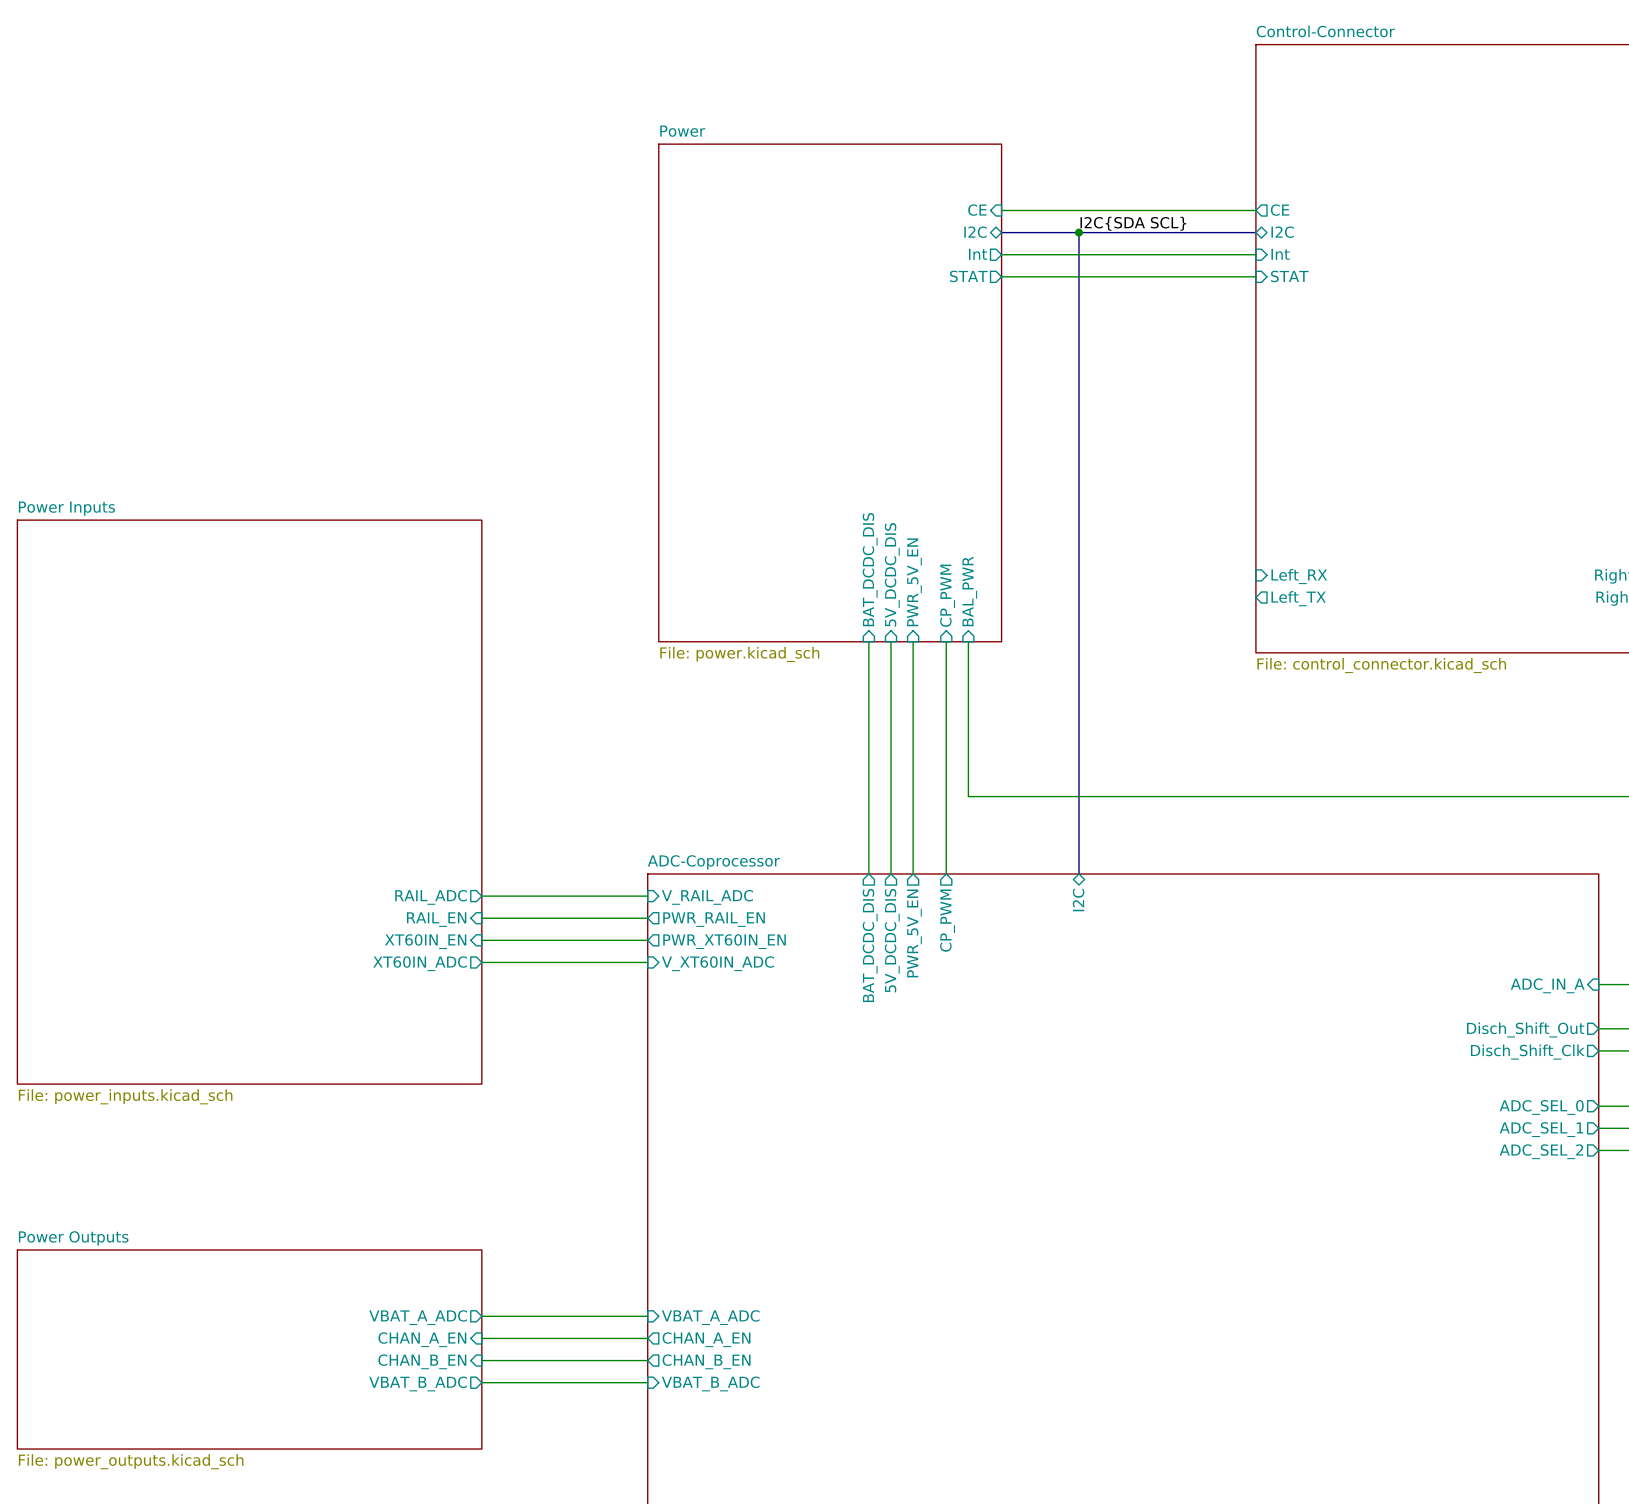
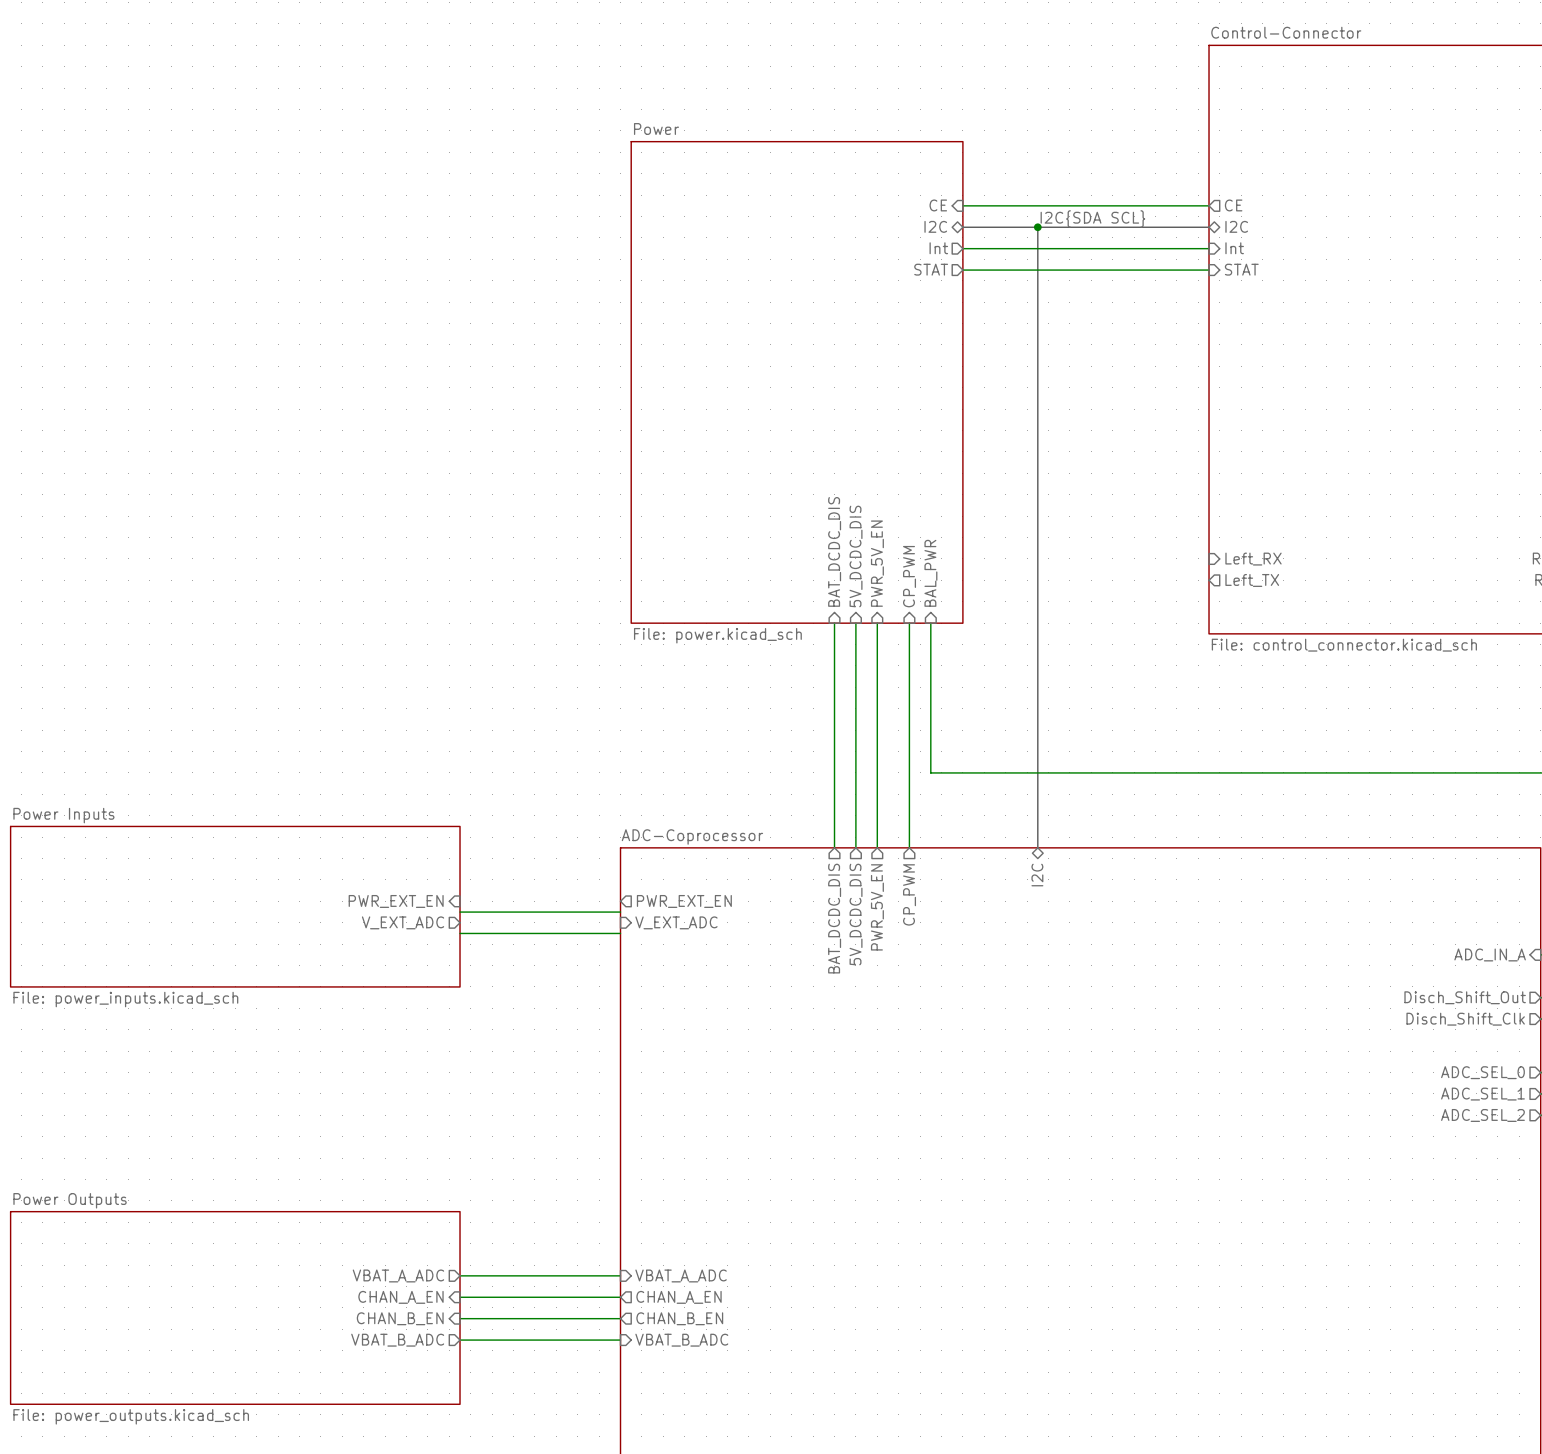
sheet Power Inputs: File: power_inputs.kicad_sch (249, 802) -> none
wire: (481, 896) (647, 896) -> none
sheet pin: RAIL_ADC (431, 897) -> none
sheet pin: V_RAIL_ADC (707, 897) -> none
wire: (481, 918) (647, 918) -> none
sheet pin: RAIL_EN (436, 919) -> none
sheet pin: PWR_RAIL_EN (714, 919) -> none
sheet pin: none -> PWR_EXT_EN (396, 901)
sheet pin: none -> PWR_EXT_EN (684, 901)
sheet Power Inputs: none -> File: power_inputs.kicad_sch (235, 906)
sheet pin: XT60IN_EN (425, 941) -> none
sheet pin: PWR_XT60IN_EN (724, 941) -> none
sheet pin: XT60IN_ADC (420, 963) -> V_EXT_ADC (403, 922)
sheet pin: V_XT60IN_ADC (717, 963) -> V_EXT_ADC (676, 922)

